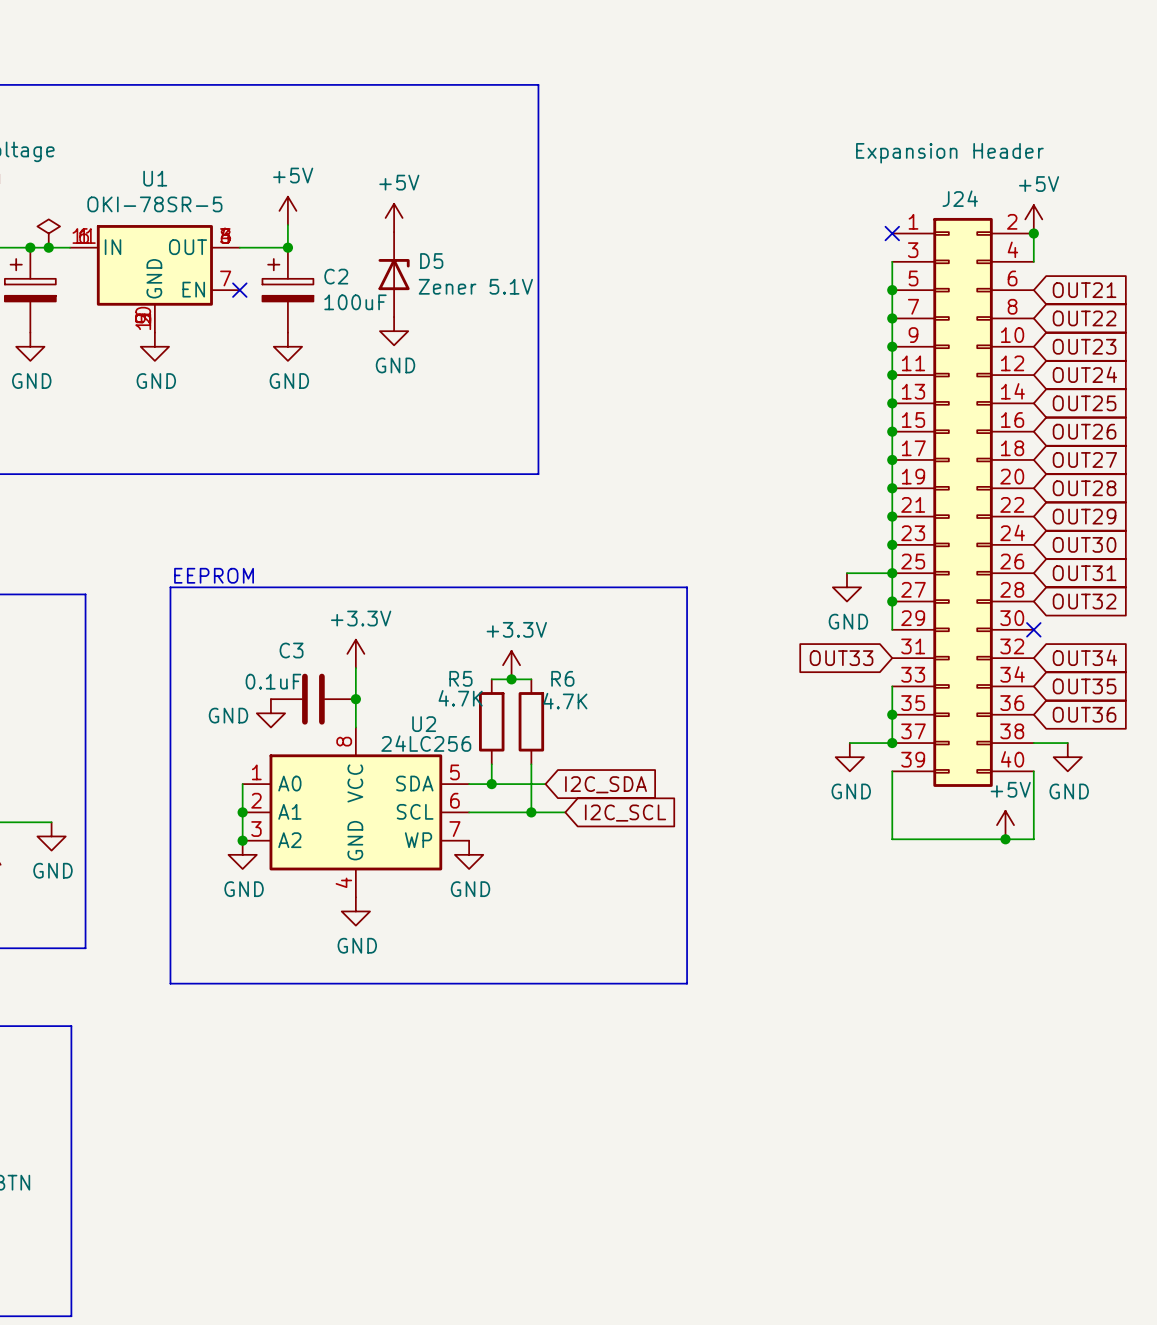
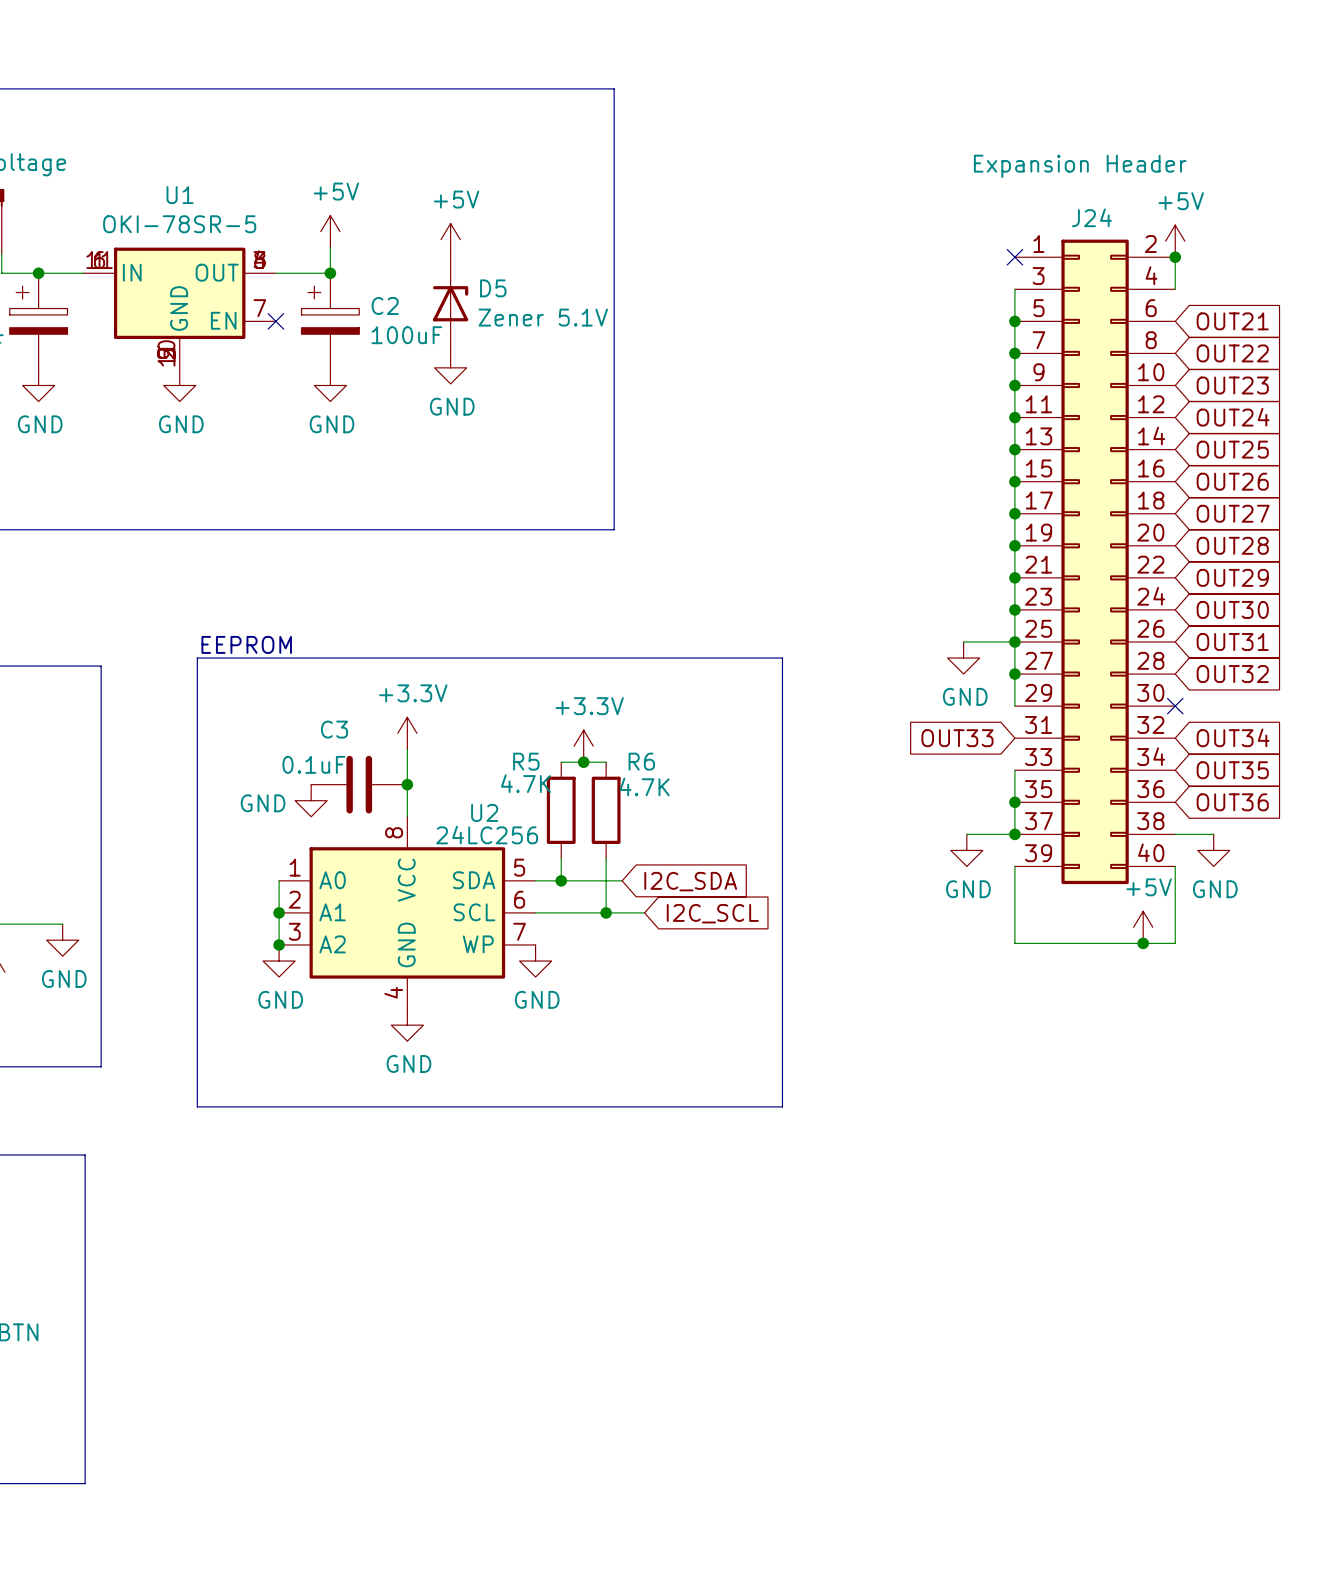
power symbol: (48, 233) -> none
junction: (48, 247) -> none

